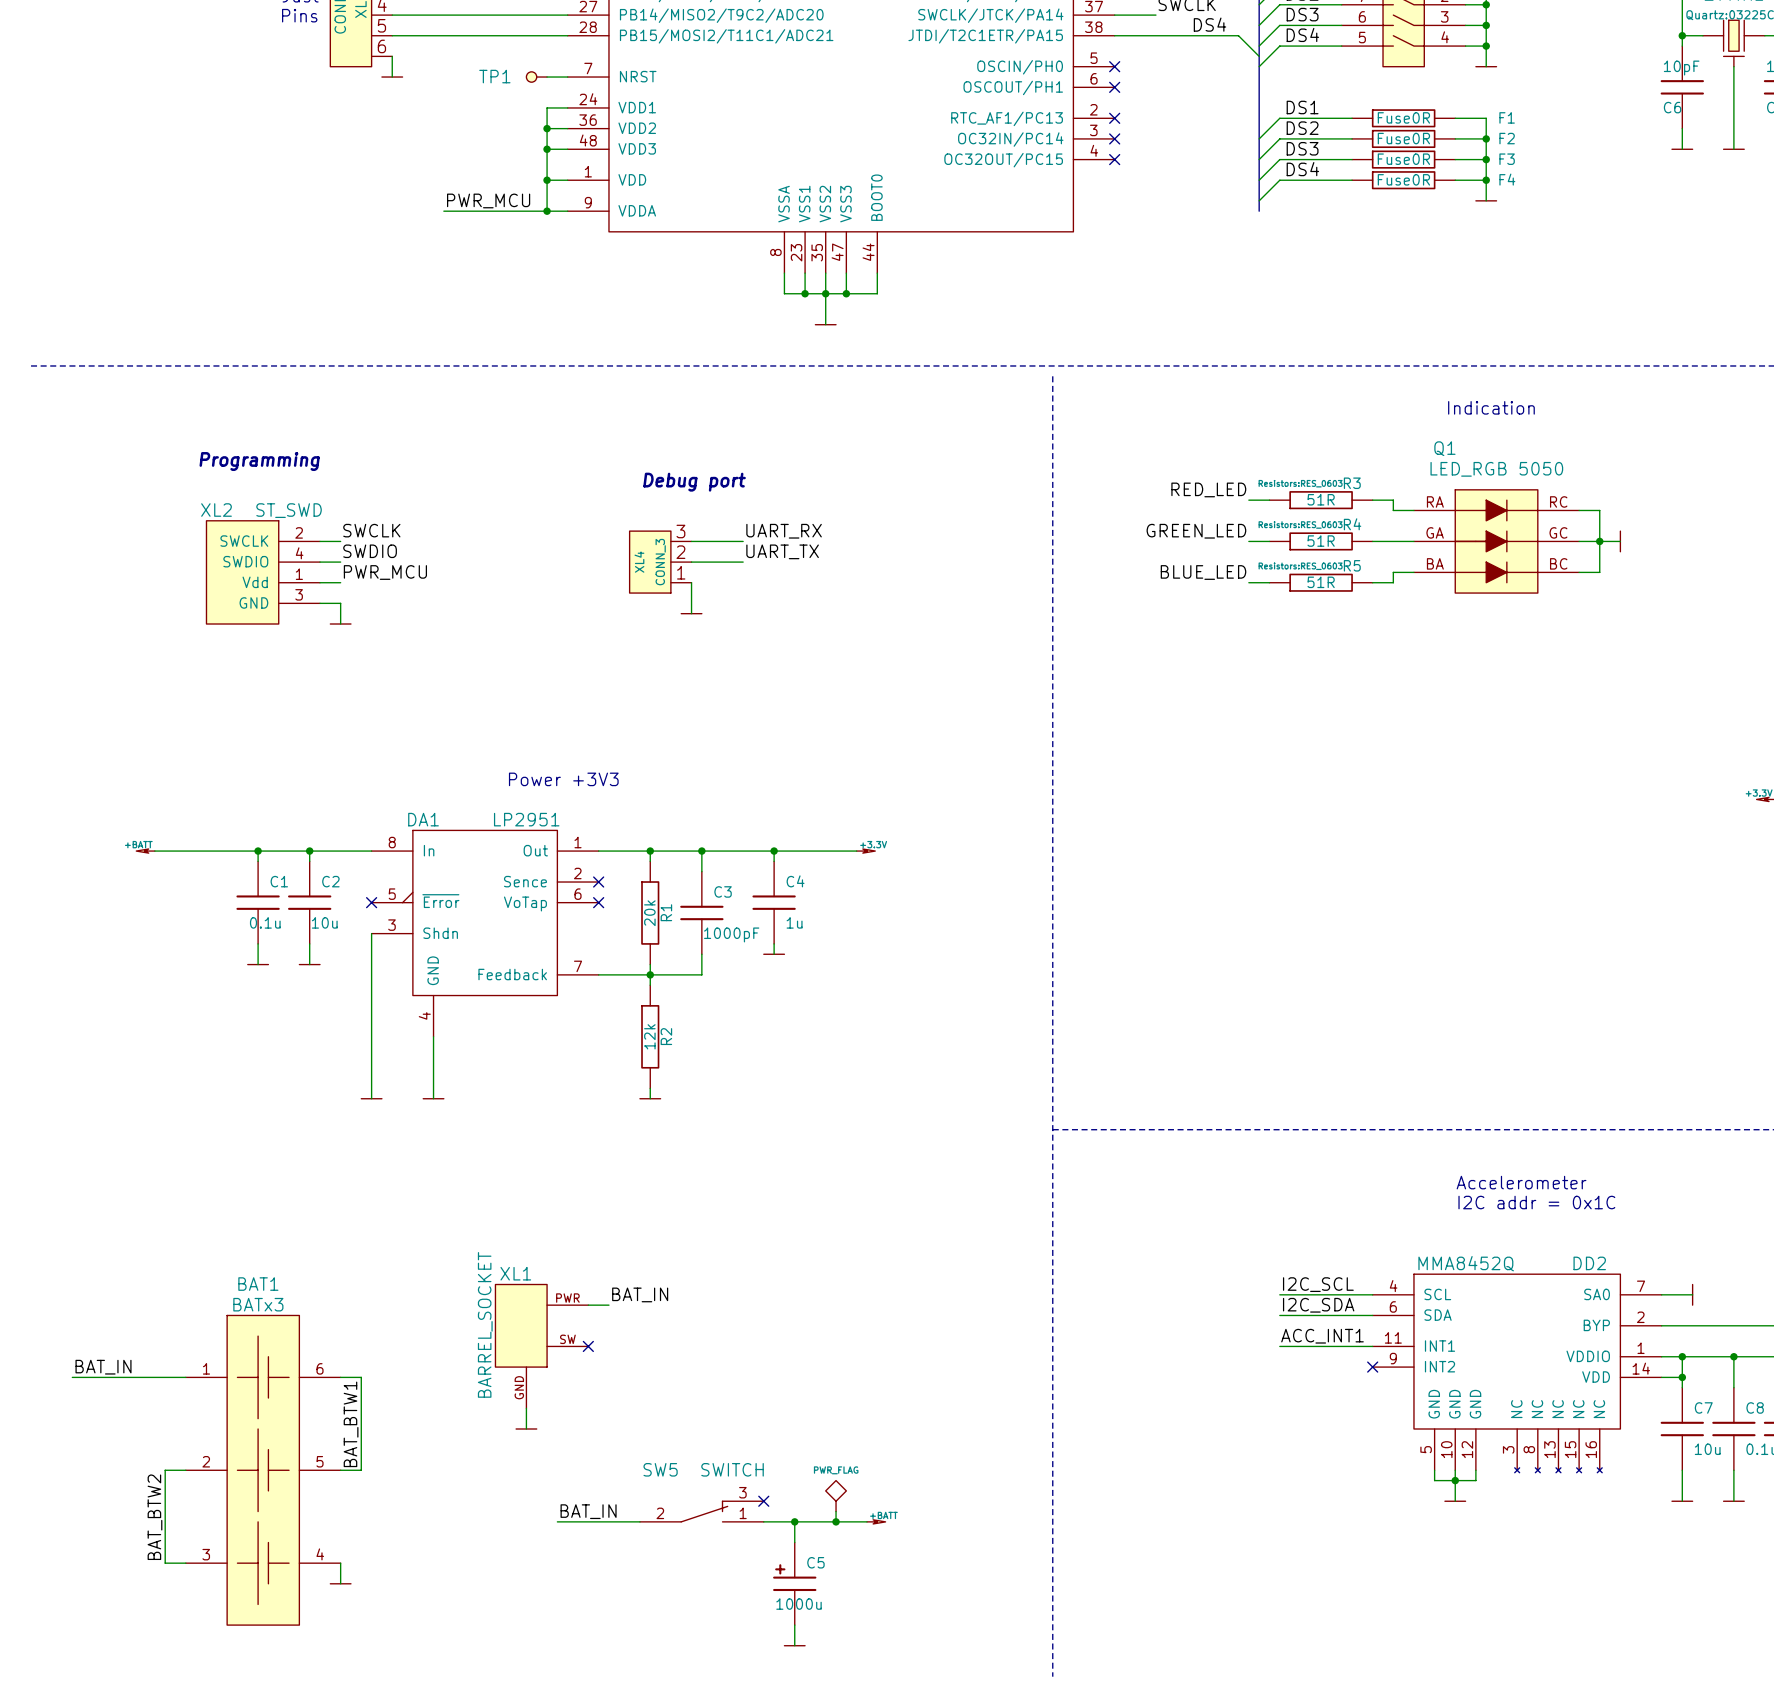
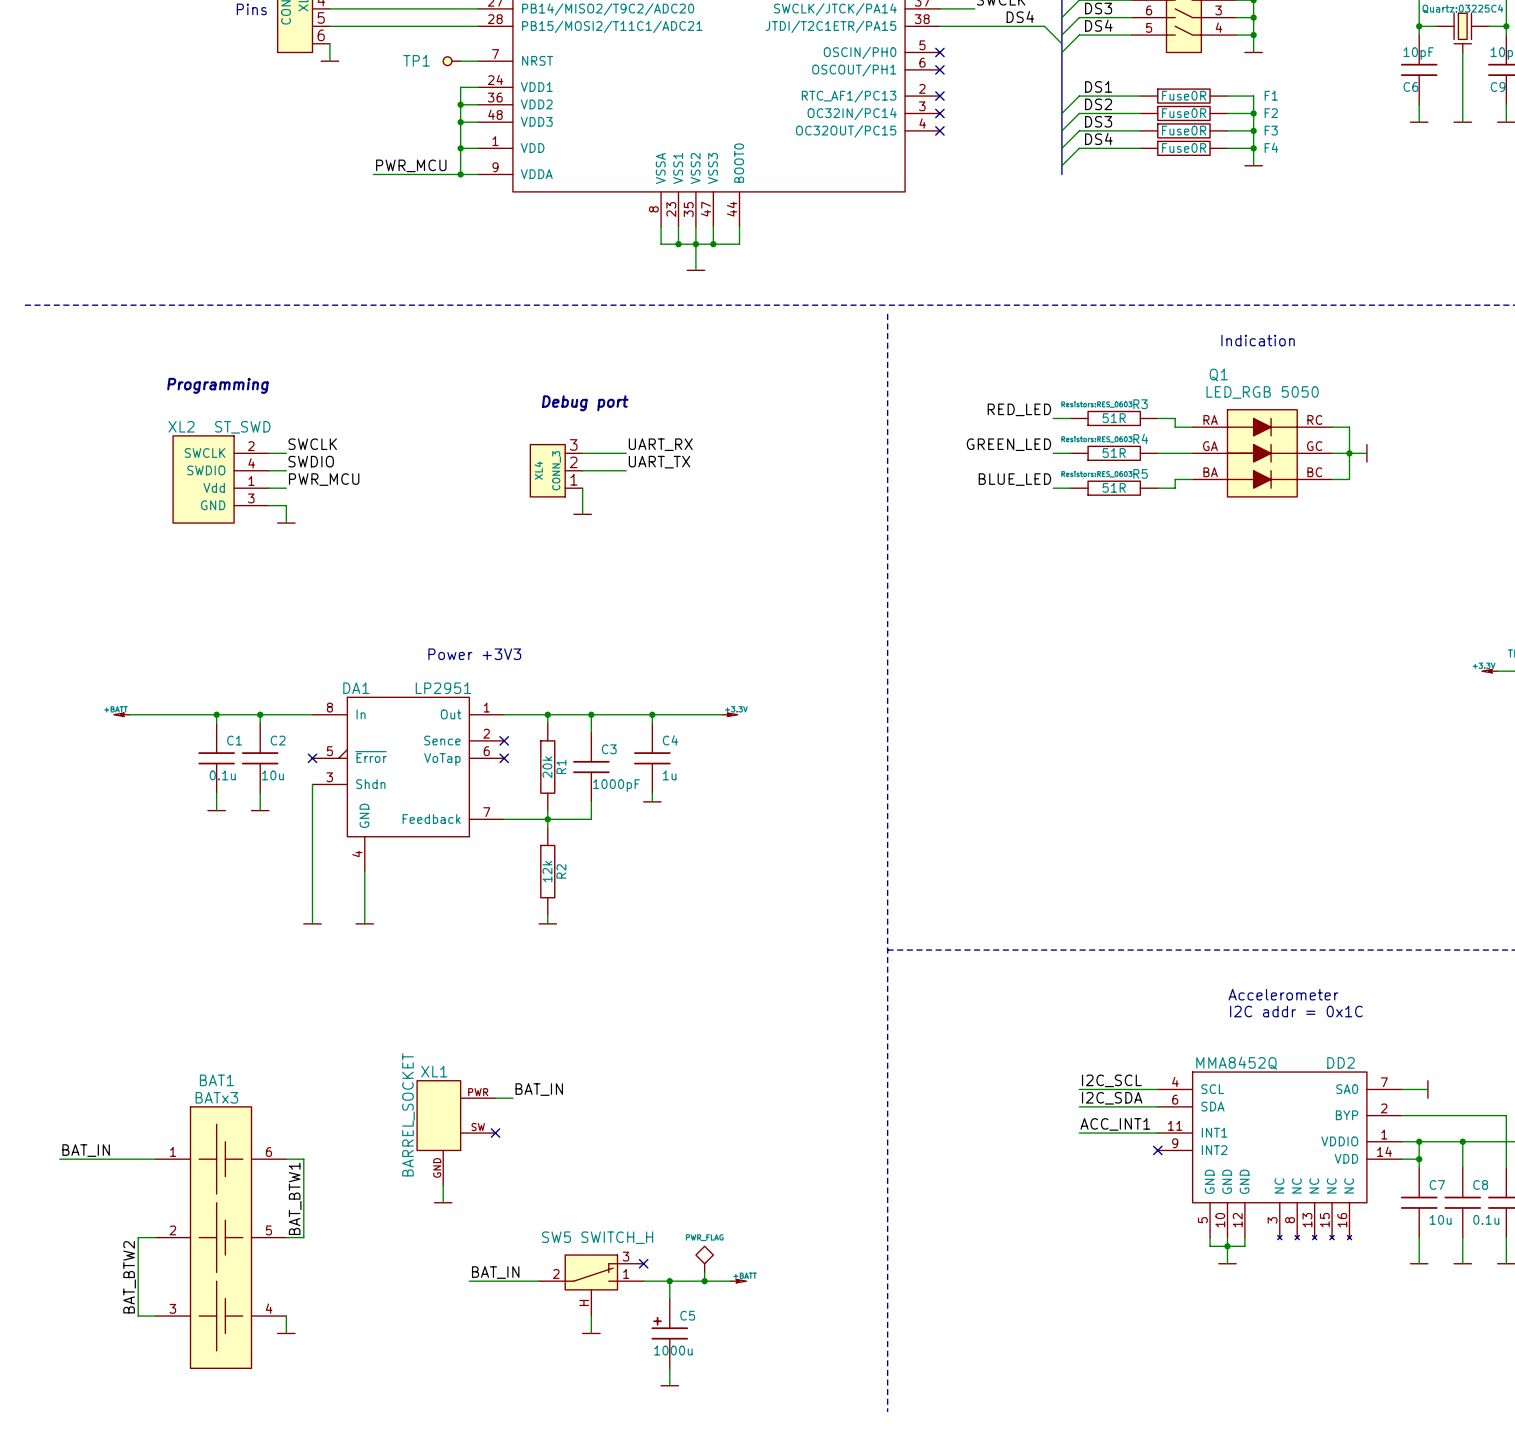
SW5 value: SWITCH (732, 1469) -> SWITCH_H (617, 1237)
SW5 symbol: [639, 1501, 764, 1522] -> [539, 1255, 644, 1317]
wire: none -> (591, 1316) (591, 1333)
power symbol: none -> (591, 1333)

